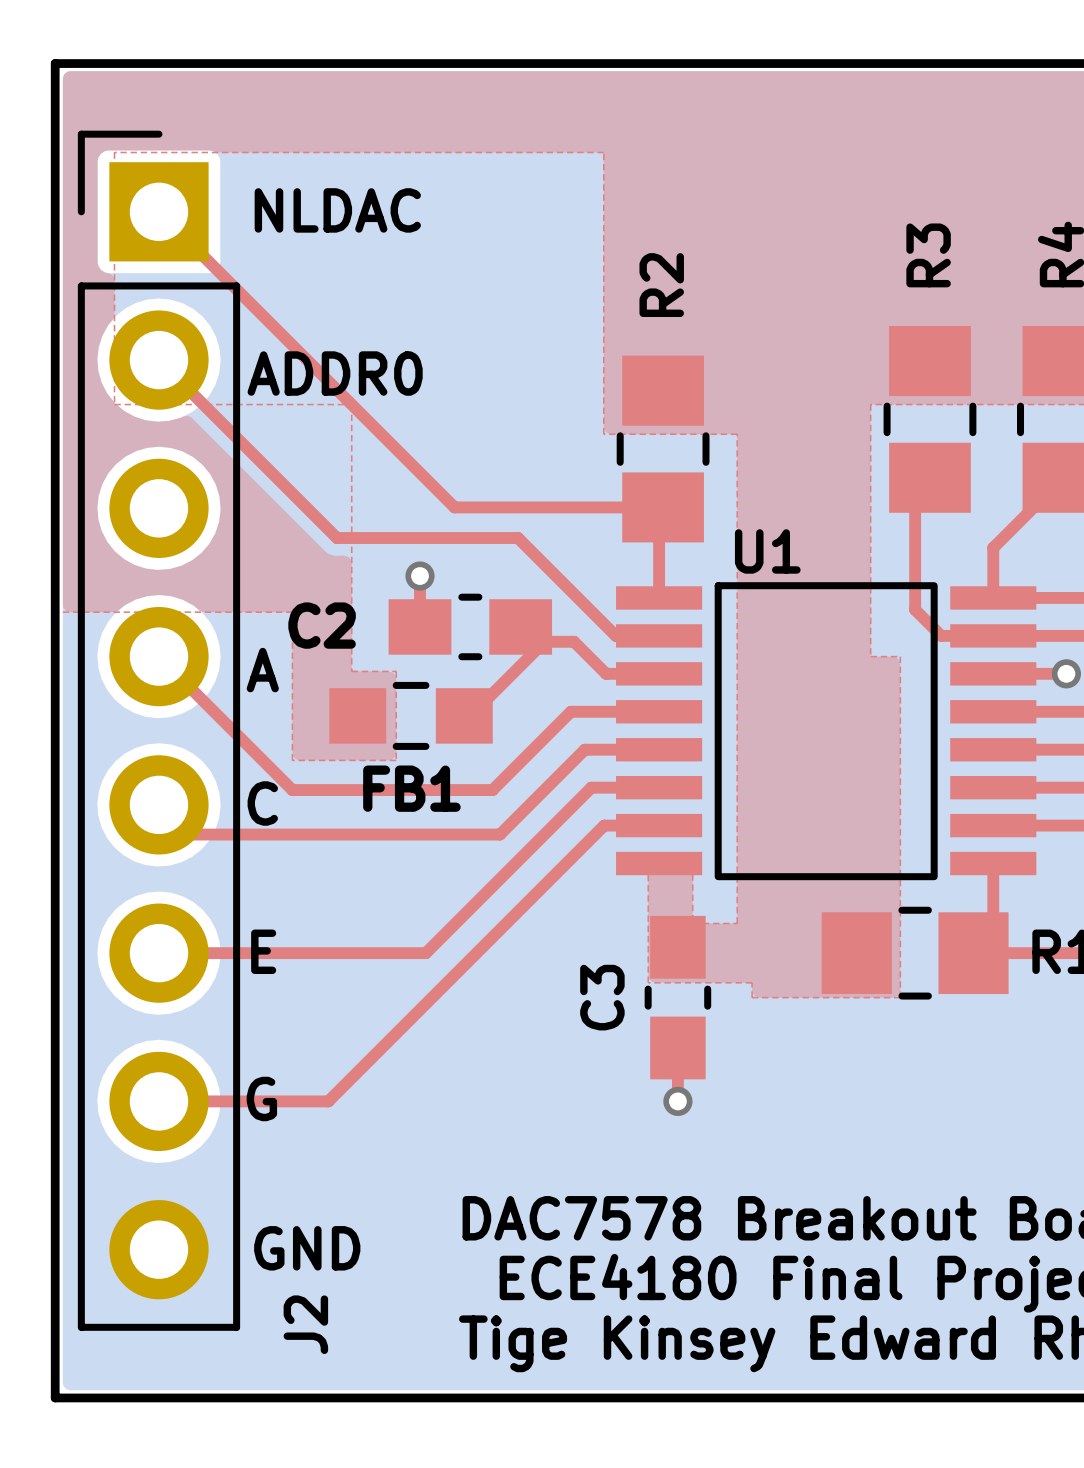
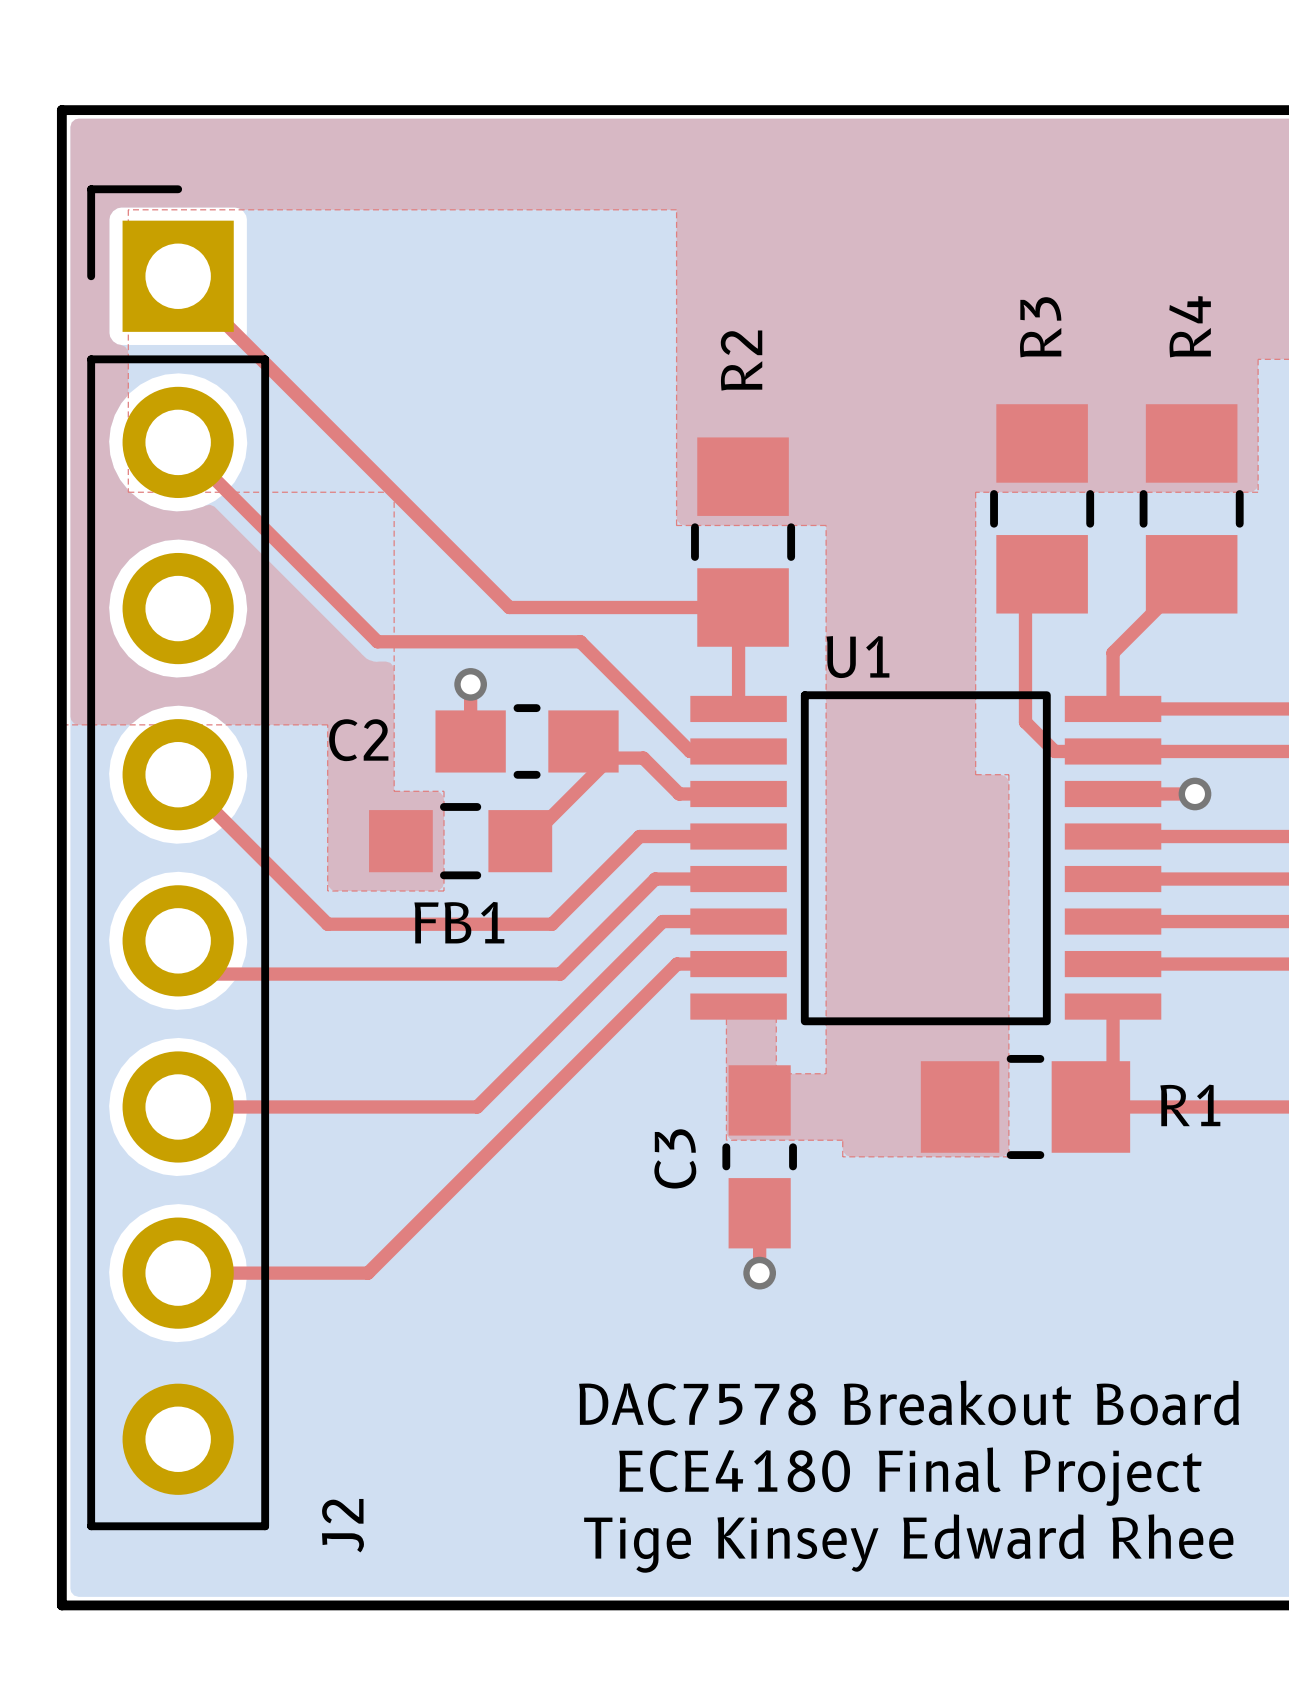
text: NLDAC (337, 210) -> none
text: ADDR0 (335, 373) -> none
text: A (262, 670) -> none
text: C (262, 803) -> none
text: E (263, 951) -> none
text: G (261, 1098) -> none
text: GND (307, 1248) -> none

